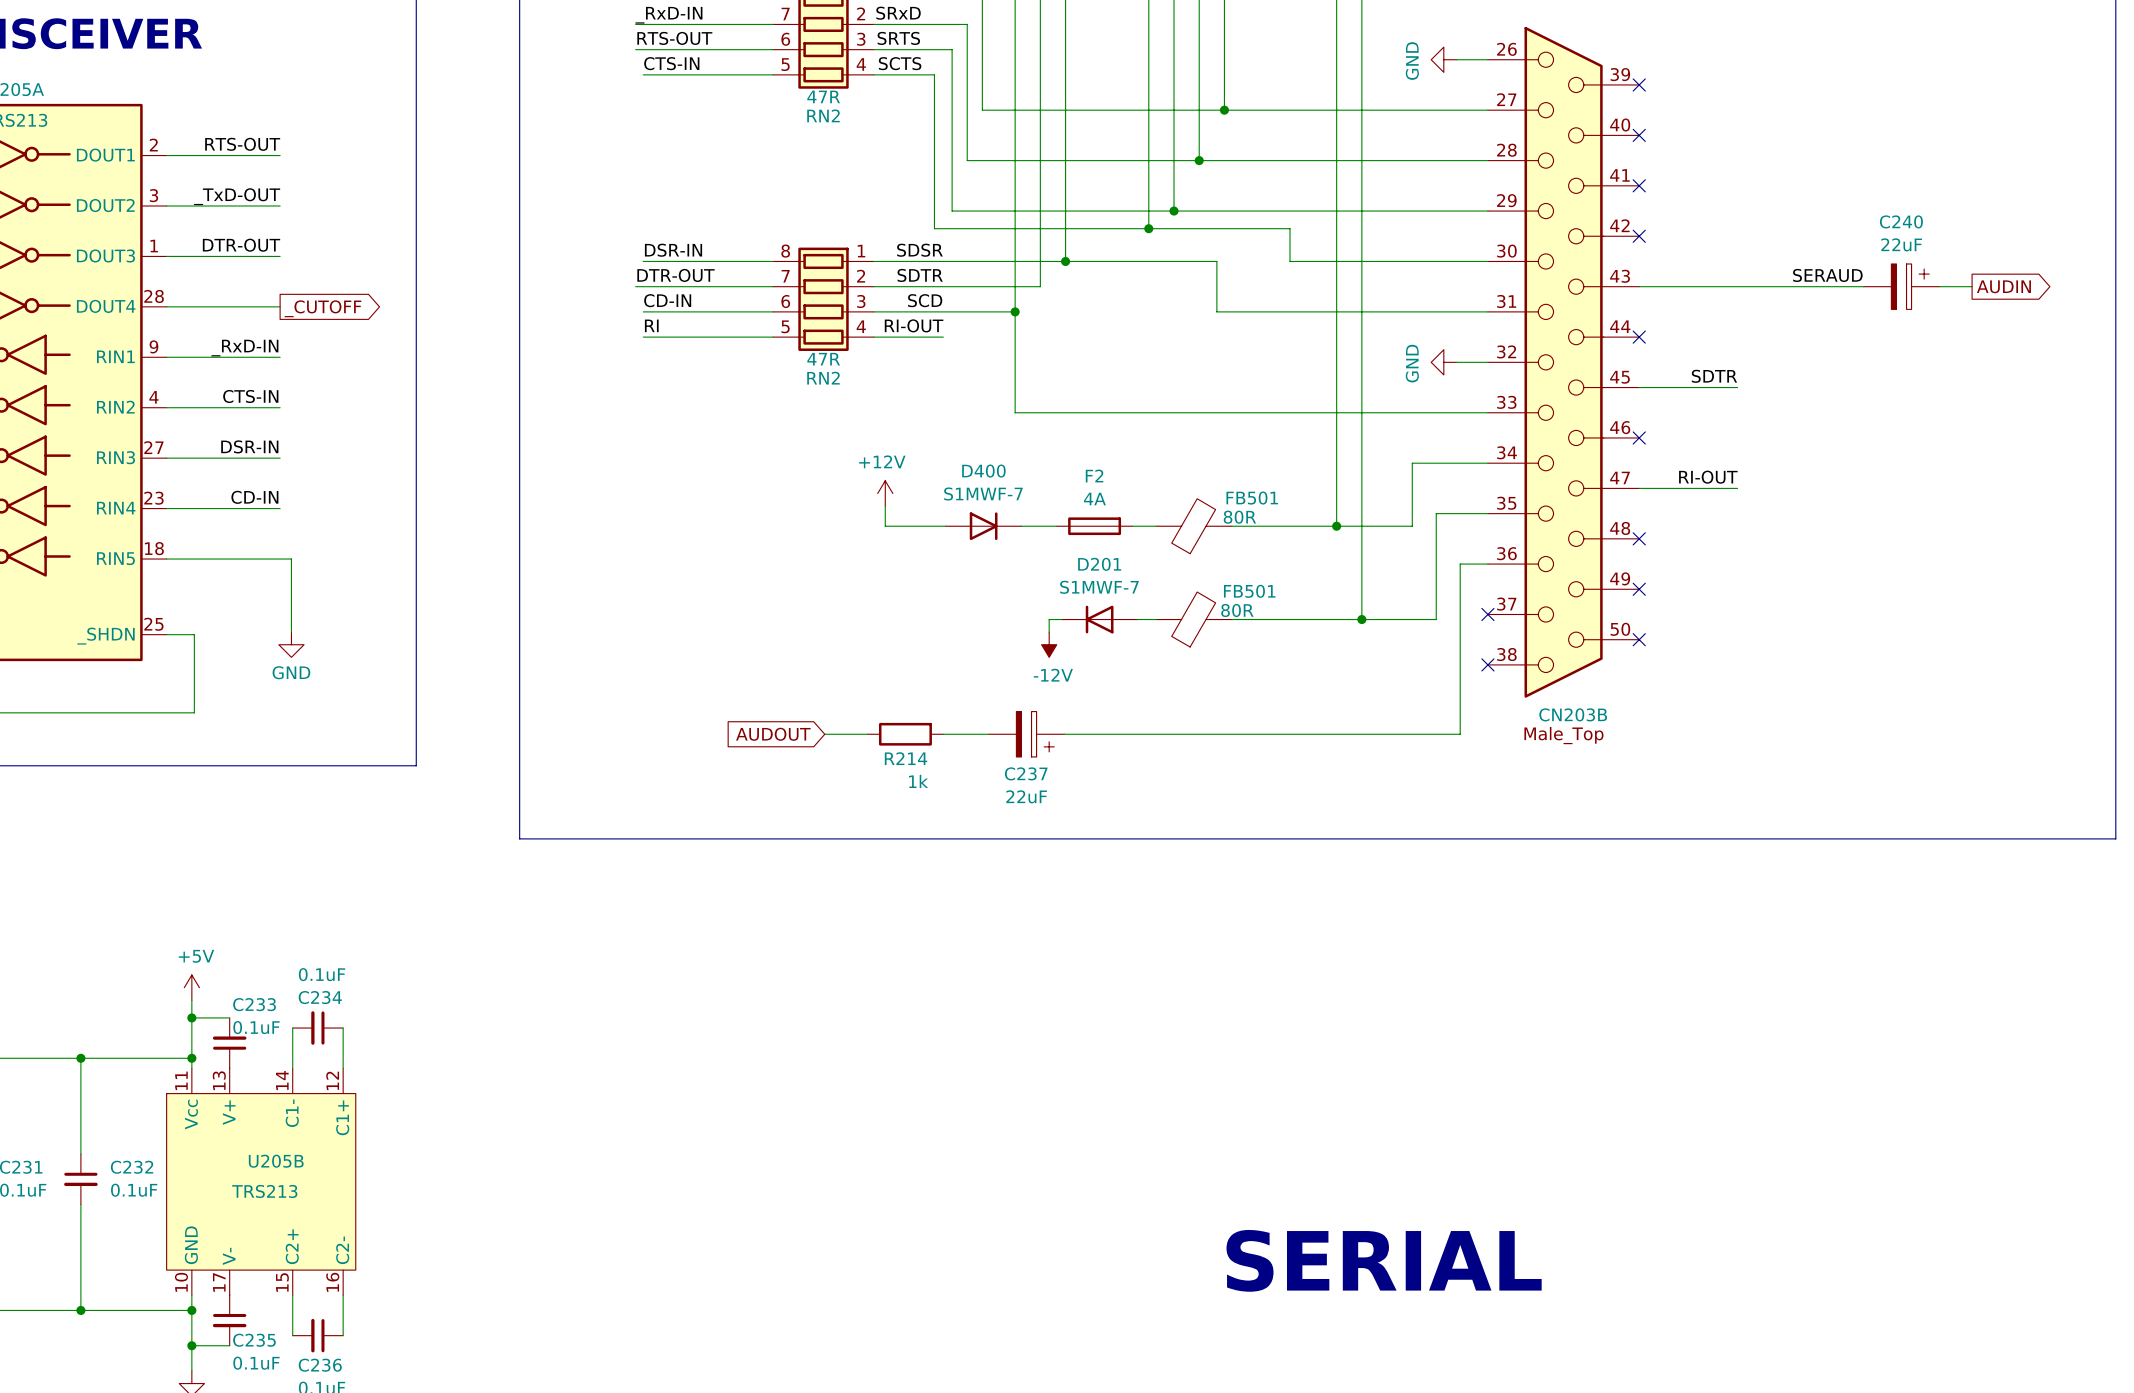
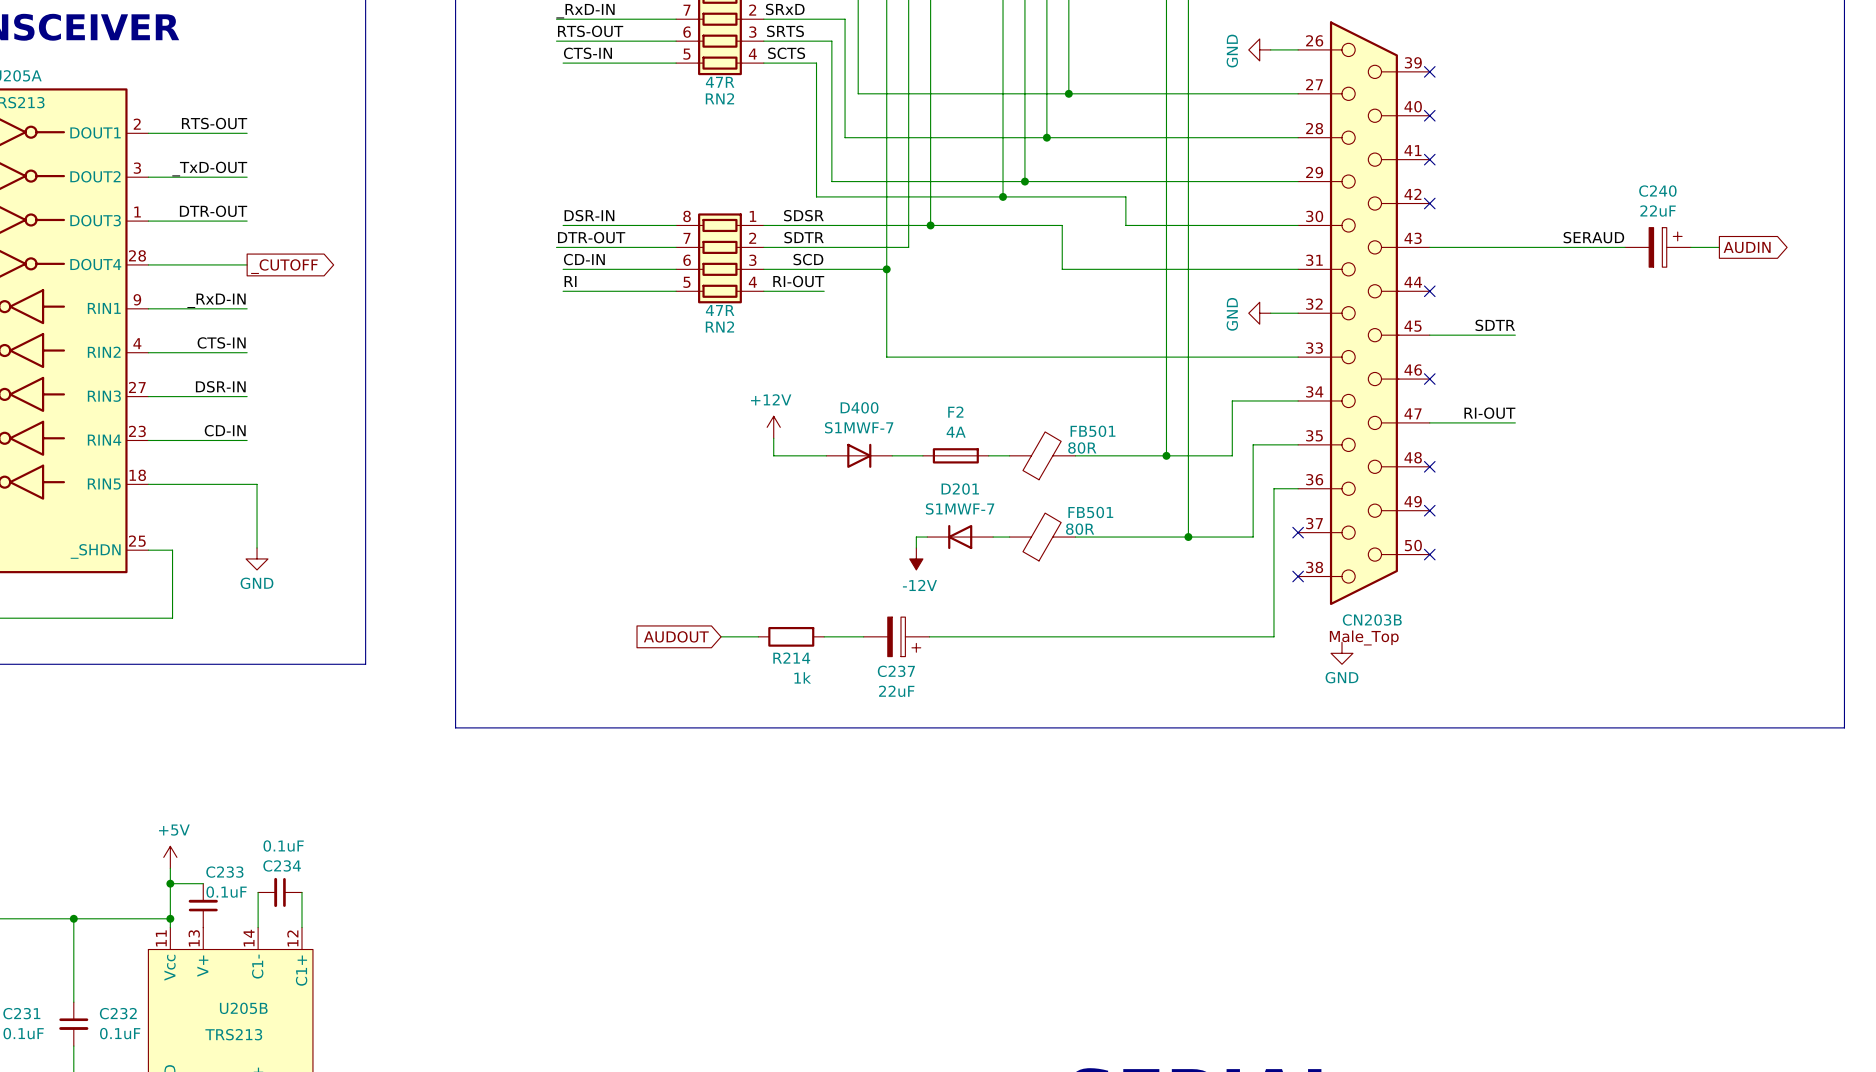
power symbol: none -> GND (1342, 653)

